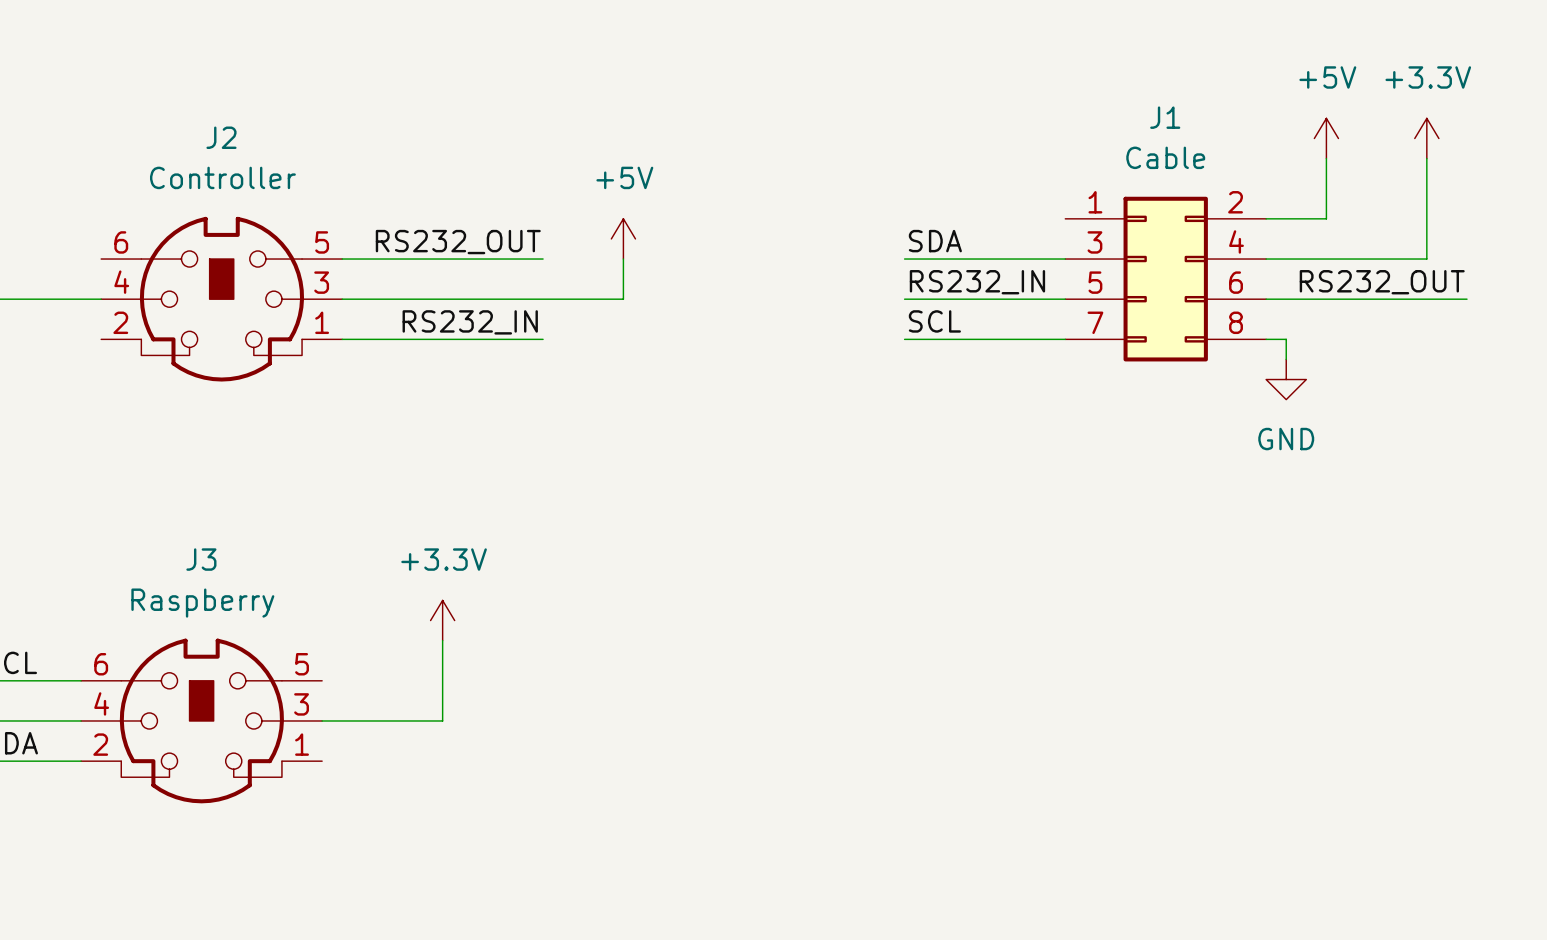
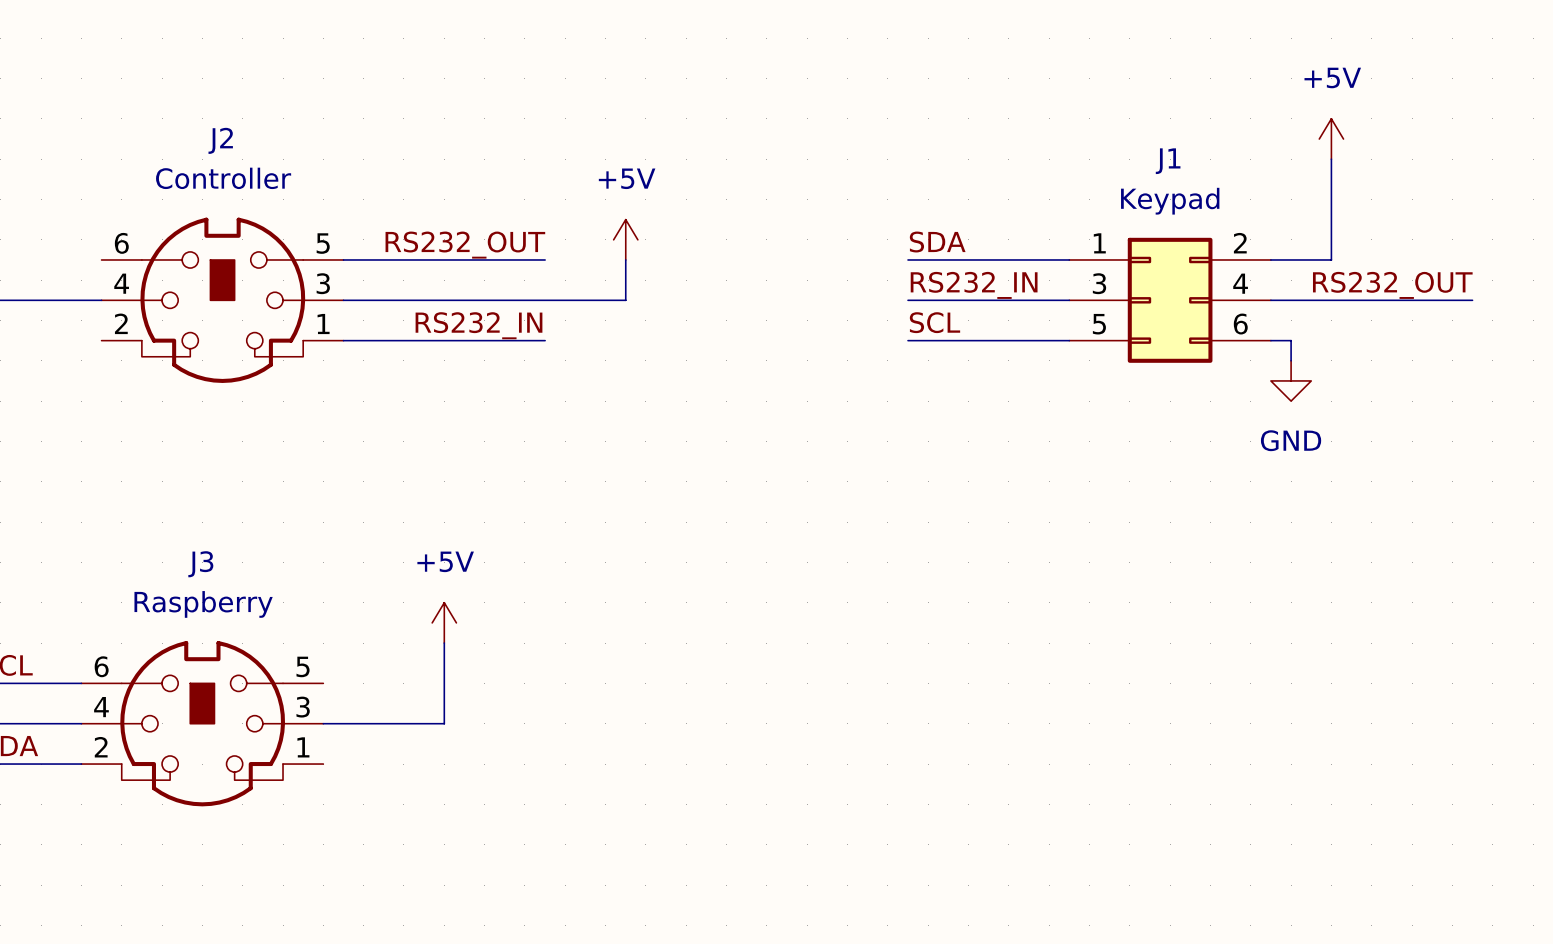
power symbol: +3.3V (1426, 138) -> none
J1 value: Cable (1165, 157) -> Keypad (1170, 201)
wire: (1426, 158) (1426, 259) (1326, 259) -> none
J1 symbol: [1065, 196, 1267, 362] -> [1069, 237, 1271, 363]
wire: (1266, 218) (1326, 218) -> (1331, 259) (1331, 219)
power symbol: +3.3V (442, 620) -> +5V (444, 622)

